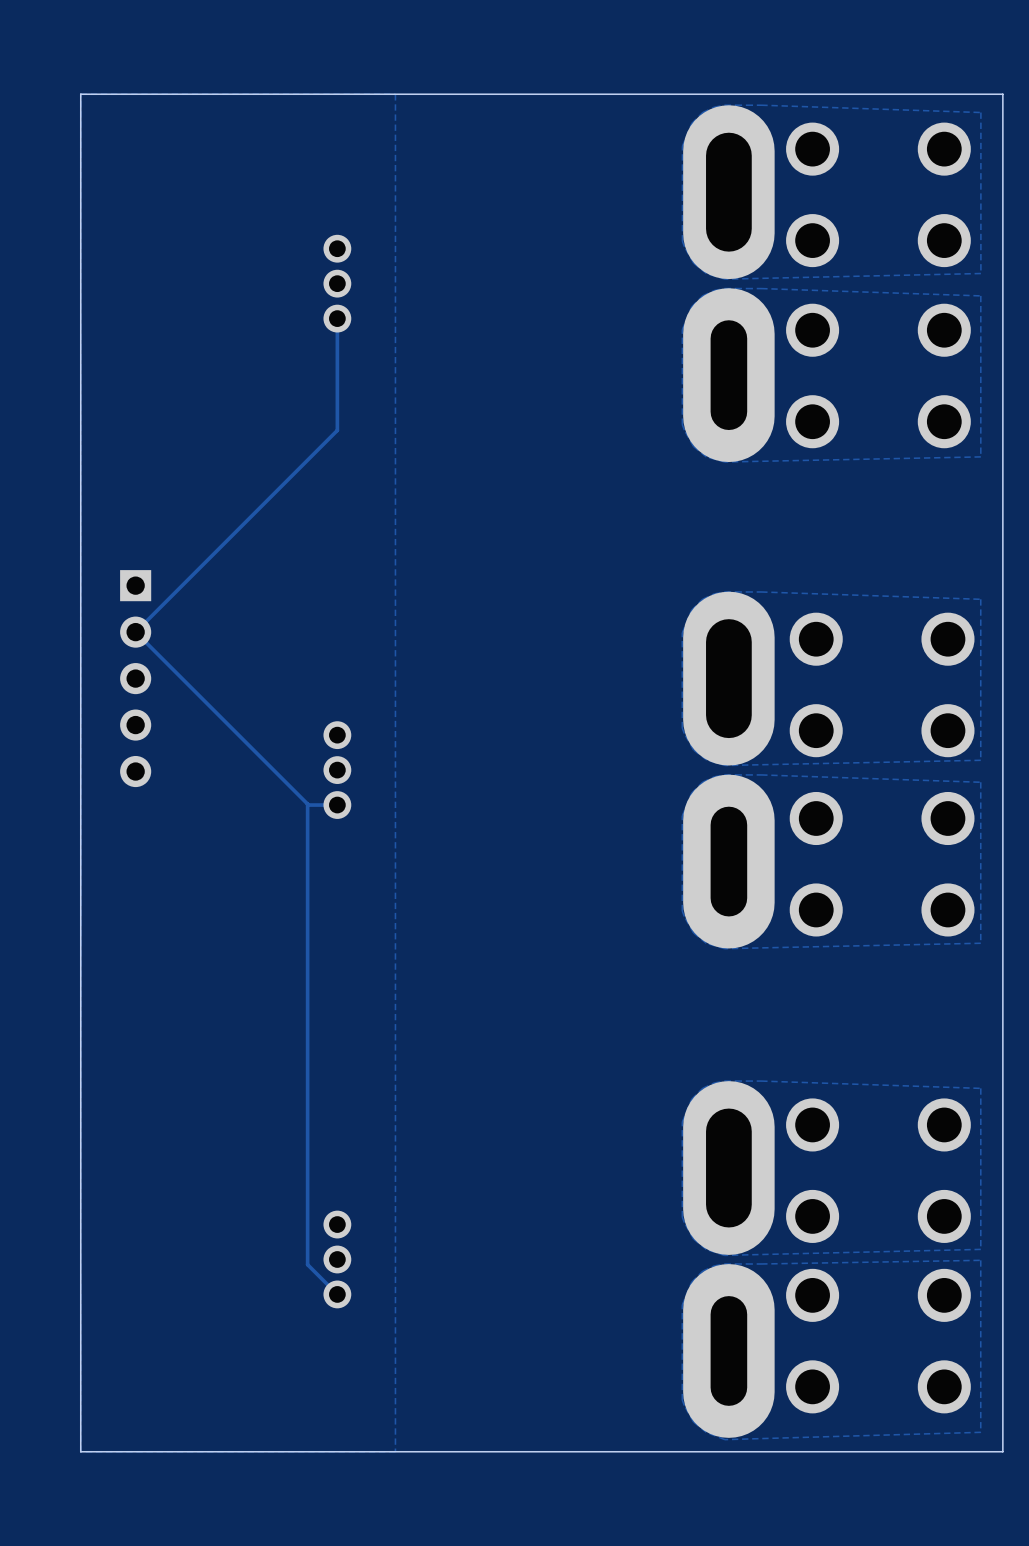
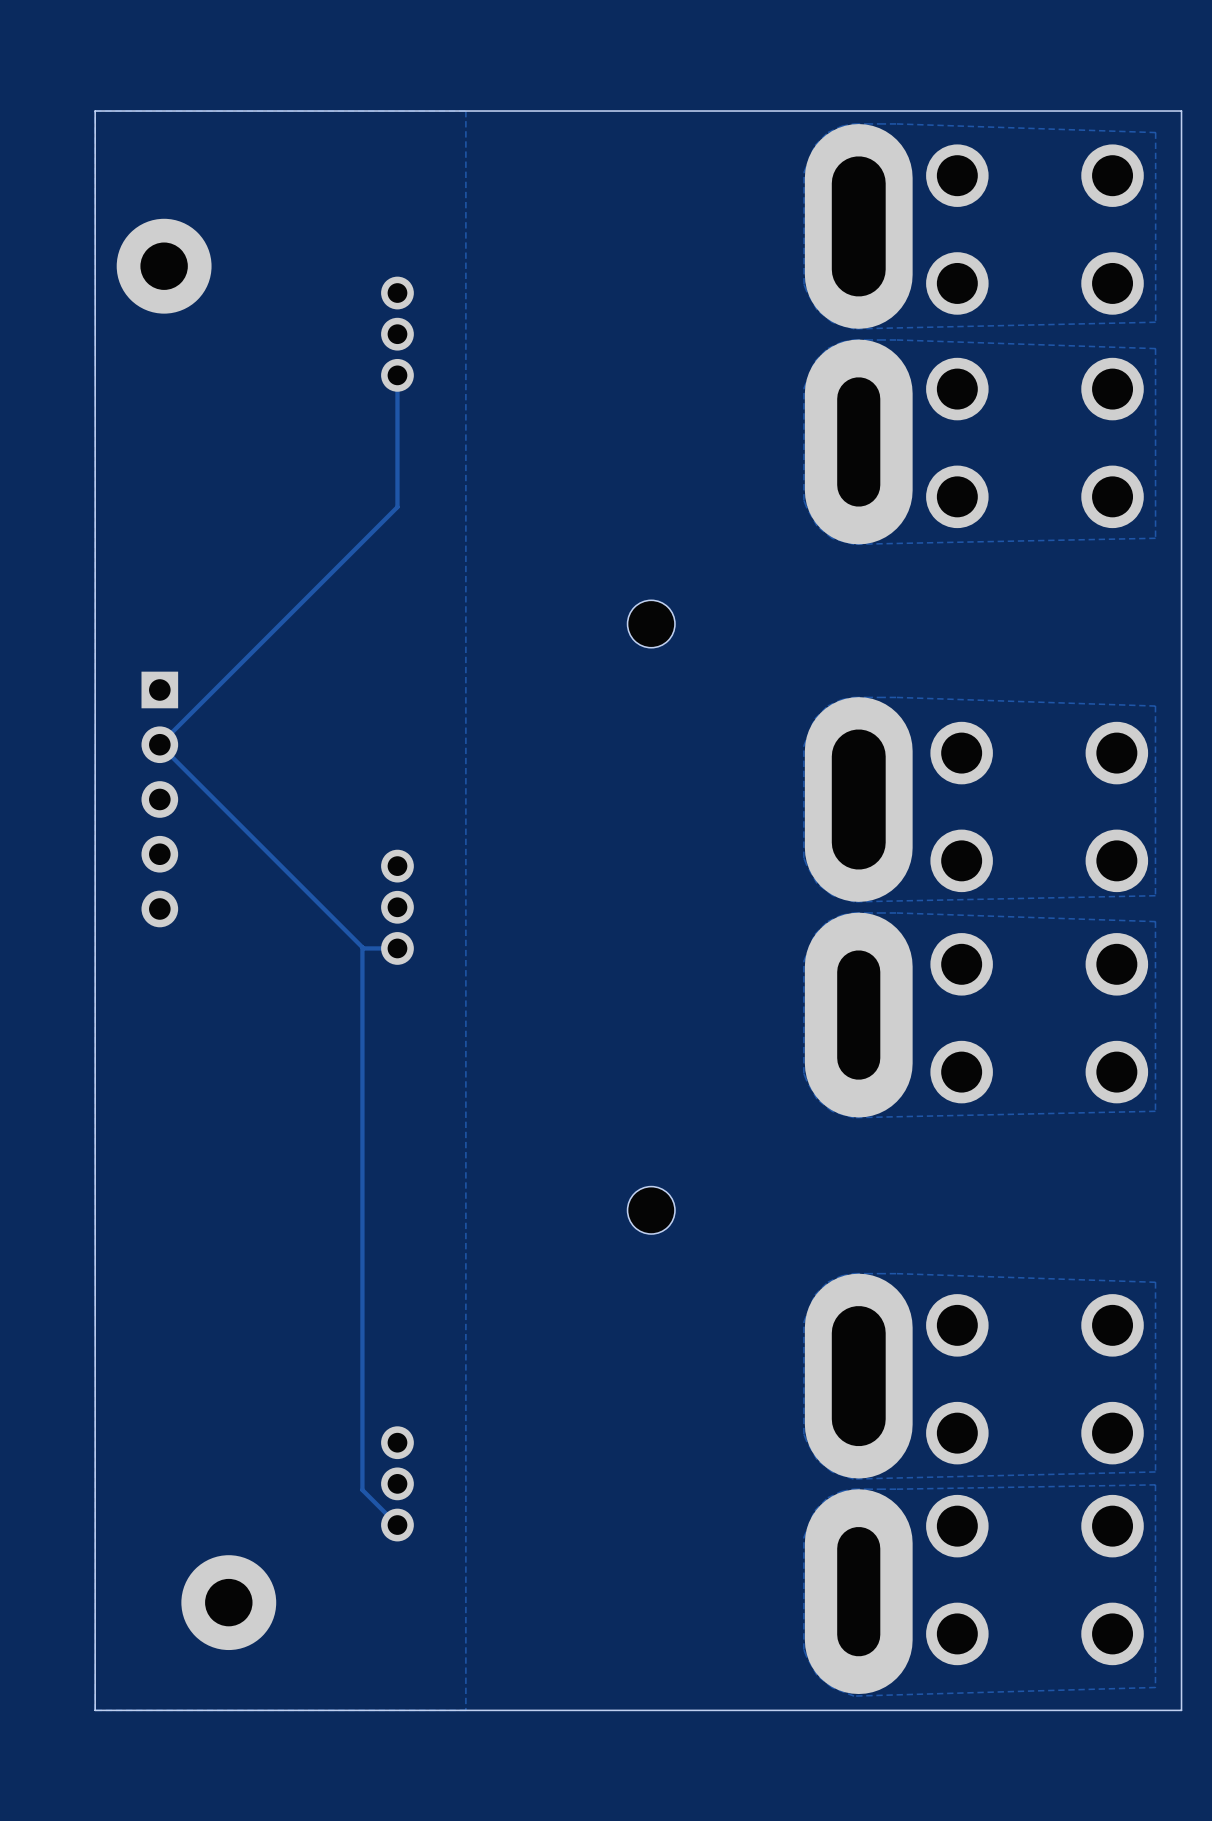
part: none -> (164, 266)
part: none -> (651, 624)
part: none -> (651, 1210)
part: none -> (228, 1602)

